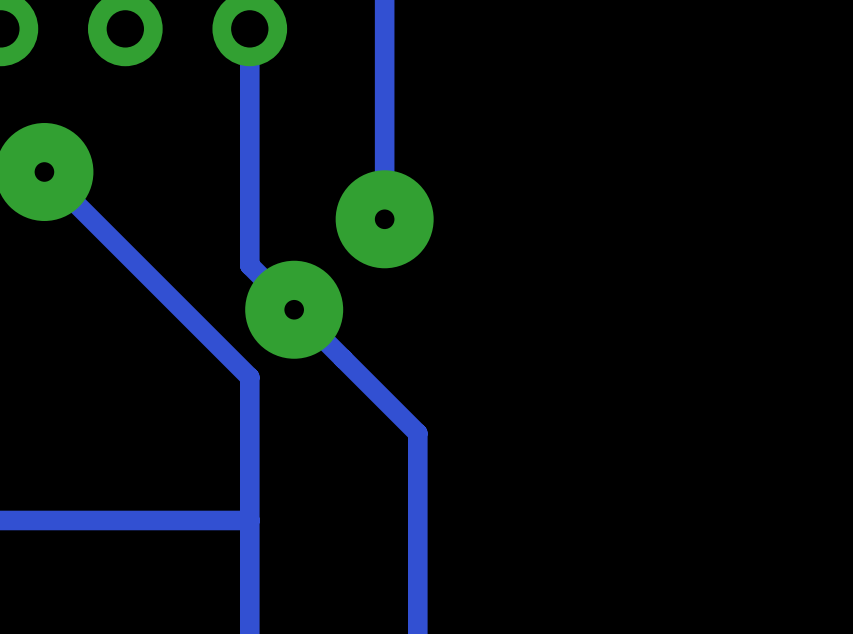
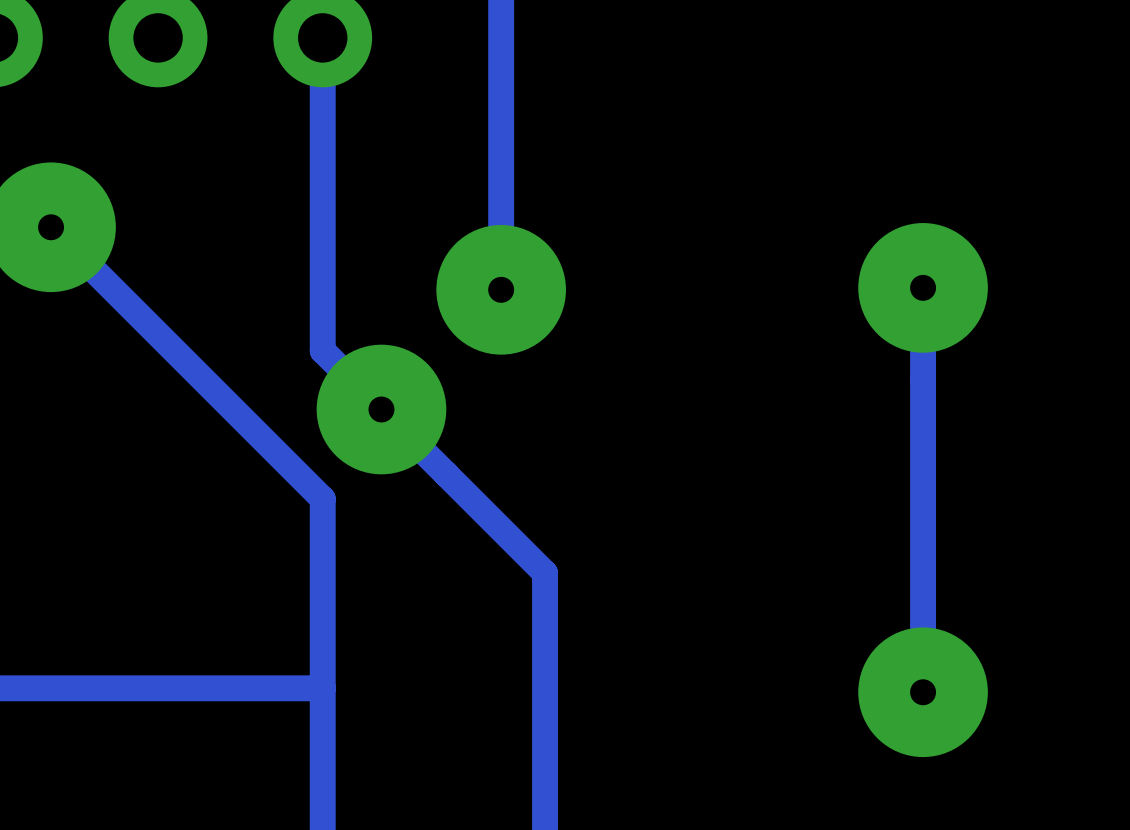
track: none -> (923, 287) (923, 692)
via: none -> (923, 287)
via: none -> (923, 692)

